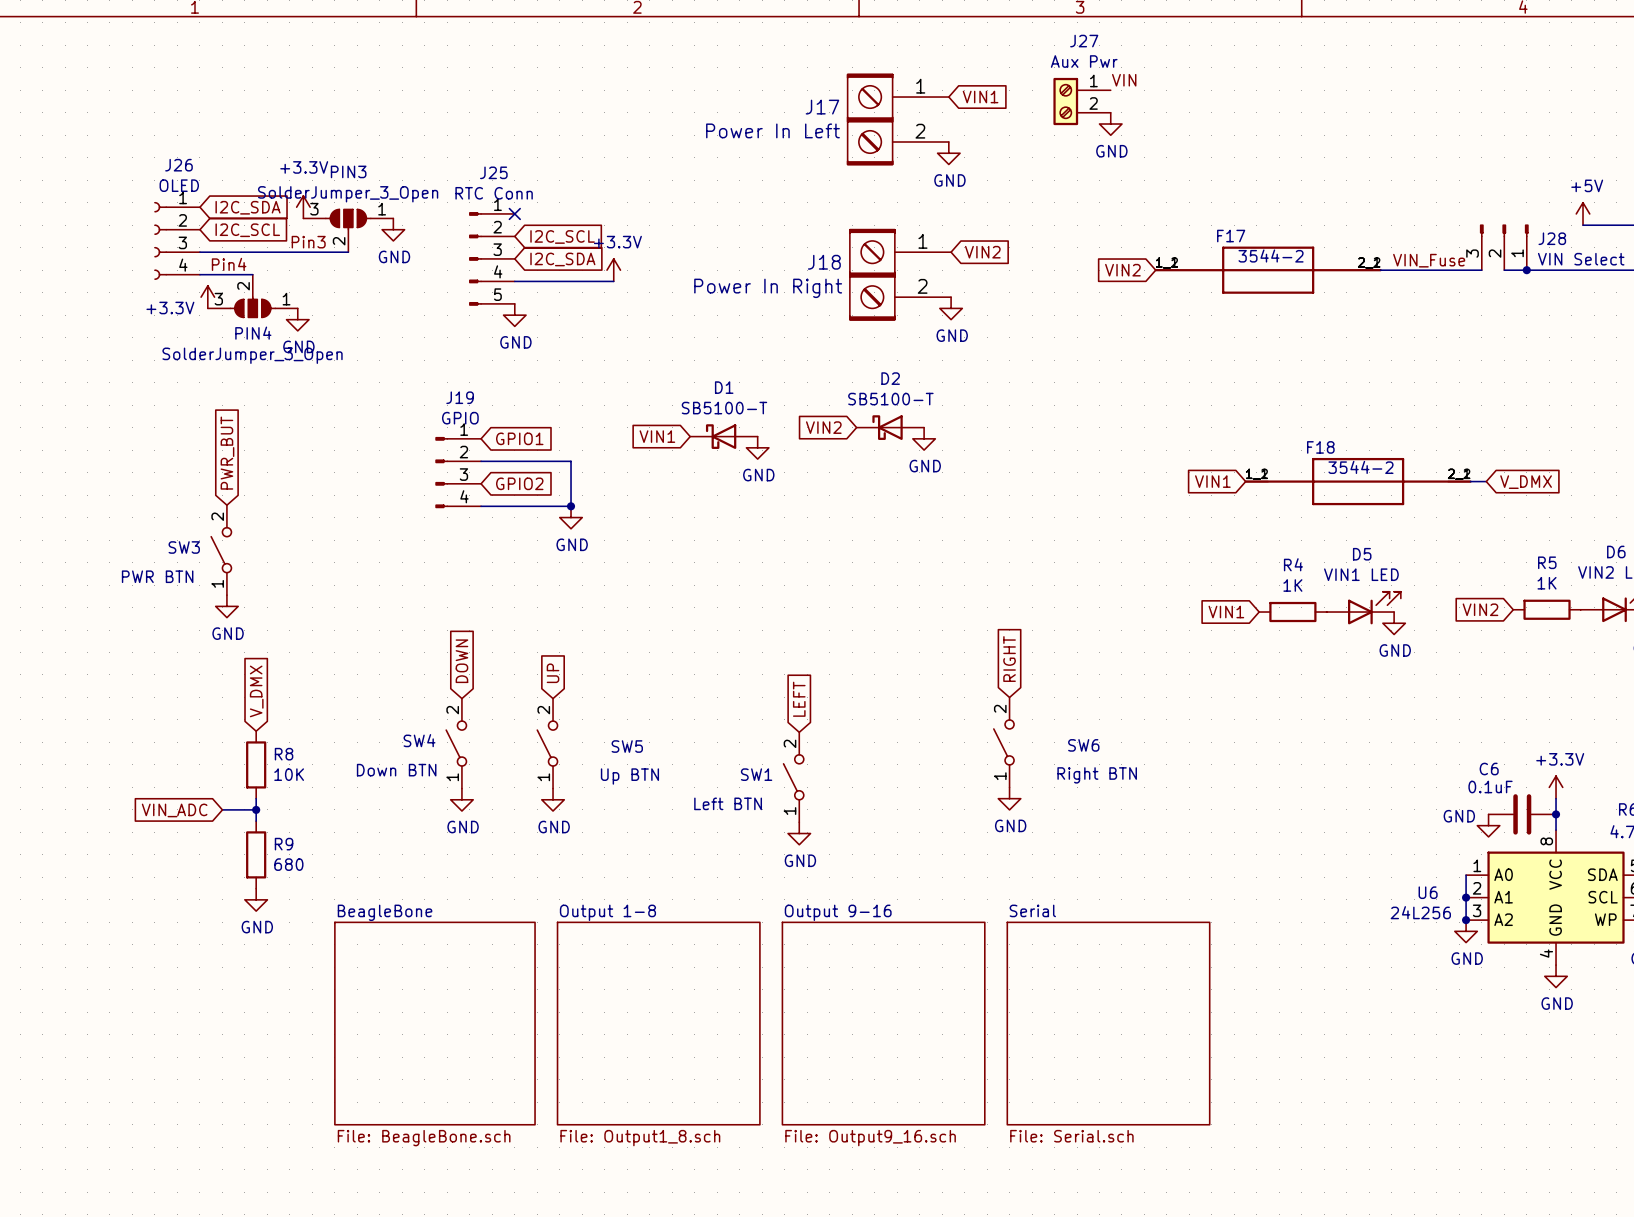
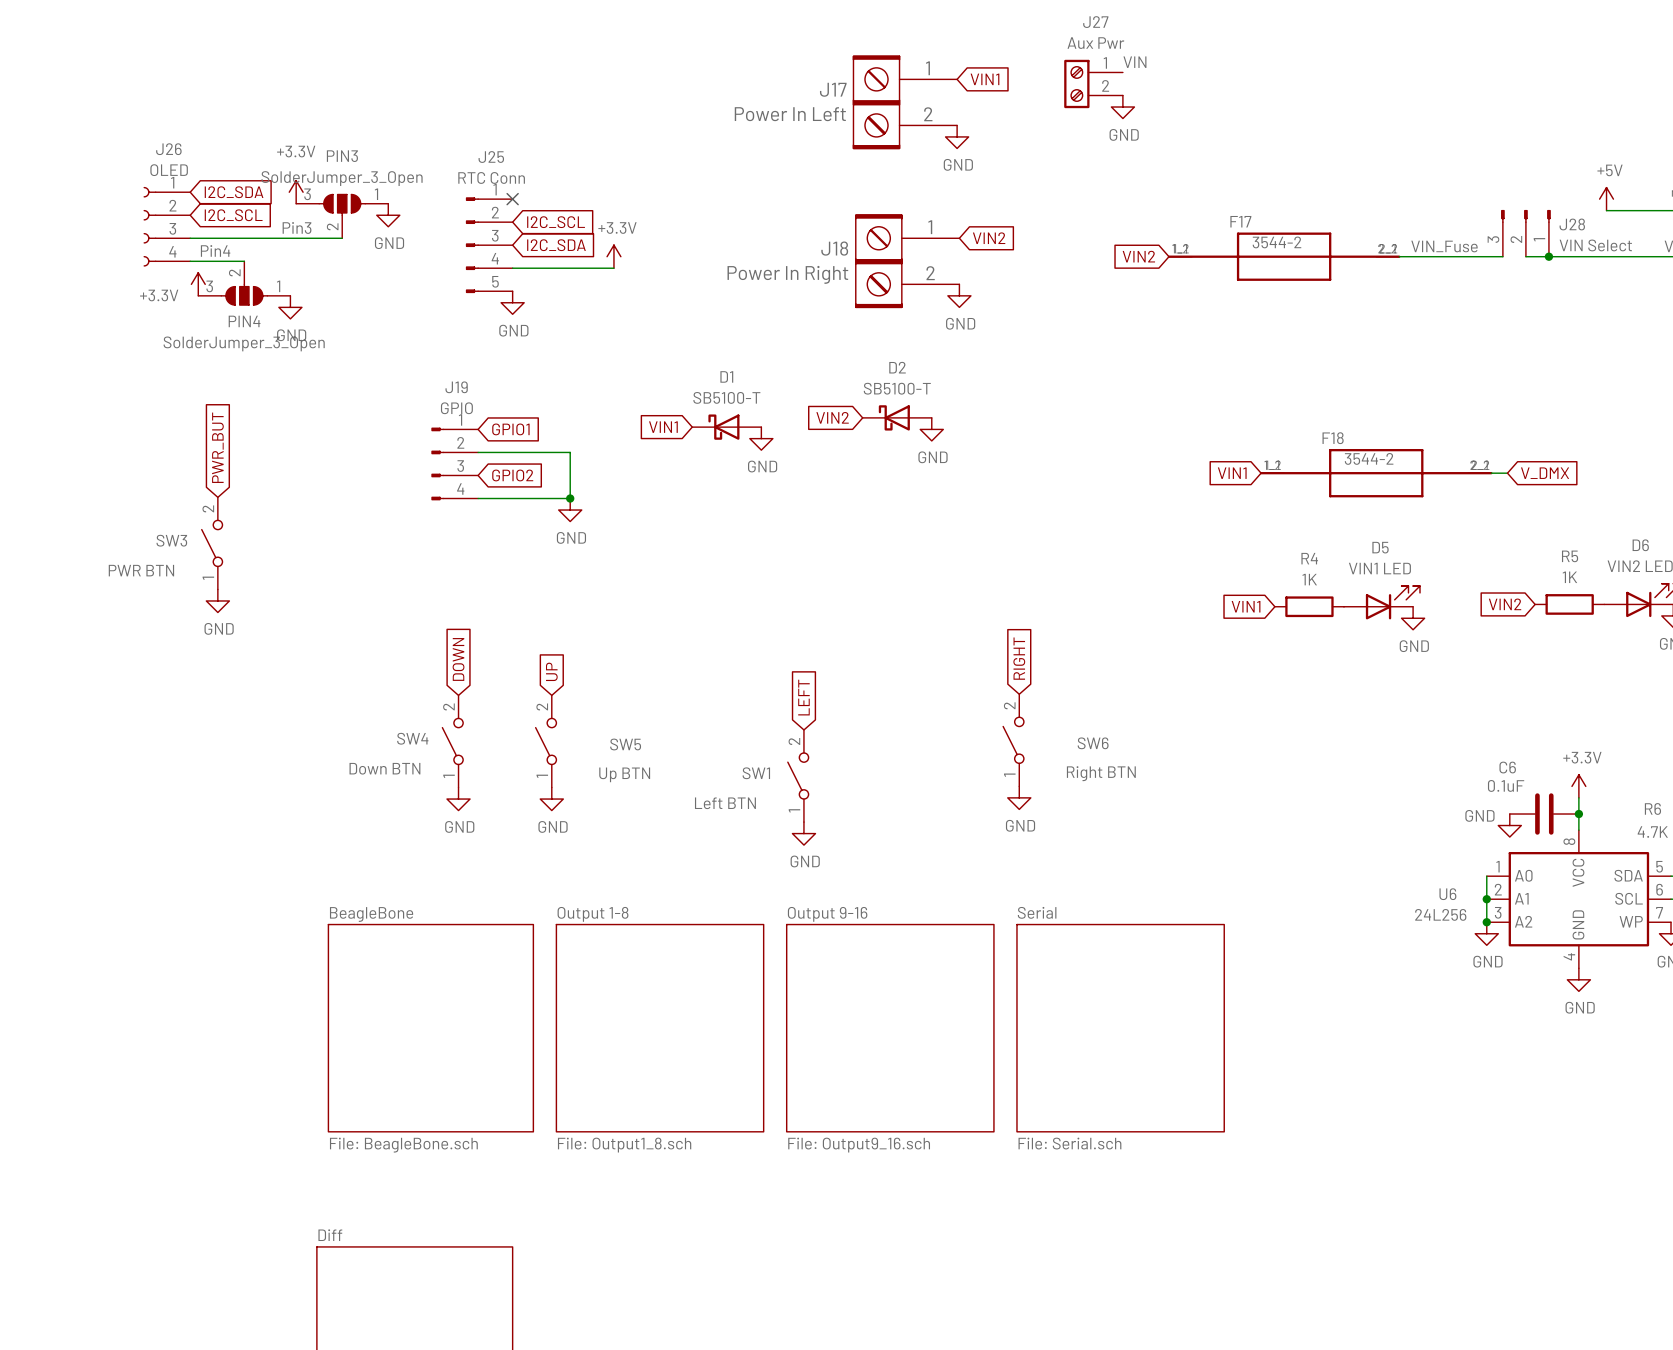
global label: V_DMX (256, 691) -> none
R8: 10K (256, 764) -> none
wire: (256, 798) (256, 821) -> none
wire: (222, 809) (256, 809) -> none
junction: (256, 809) -> none
global label: VIN_ADC (174, 810) -> none
R9: 680 (256, 854) -> none
power symbol: GND (256, 899) -> none

